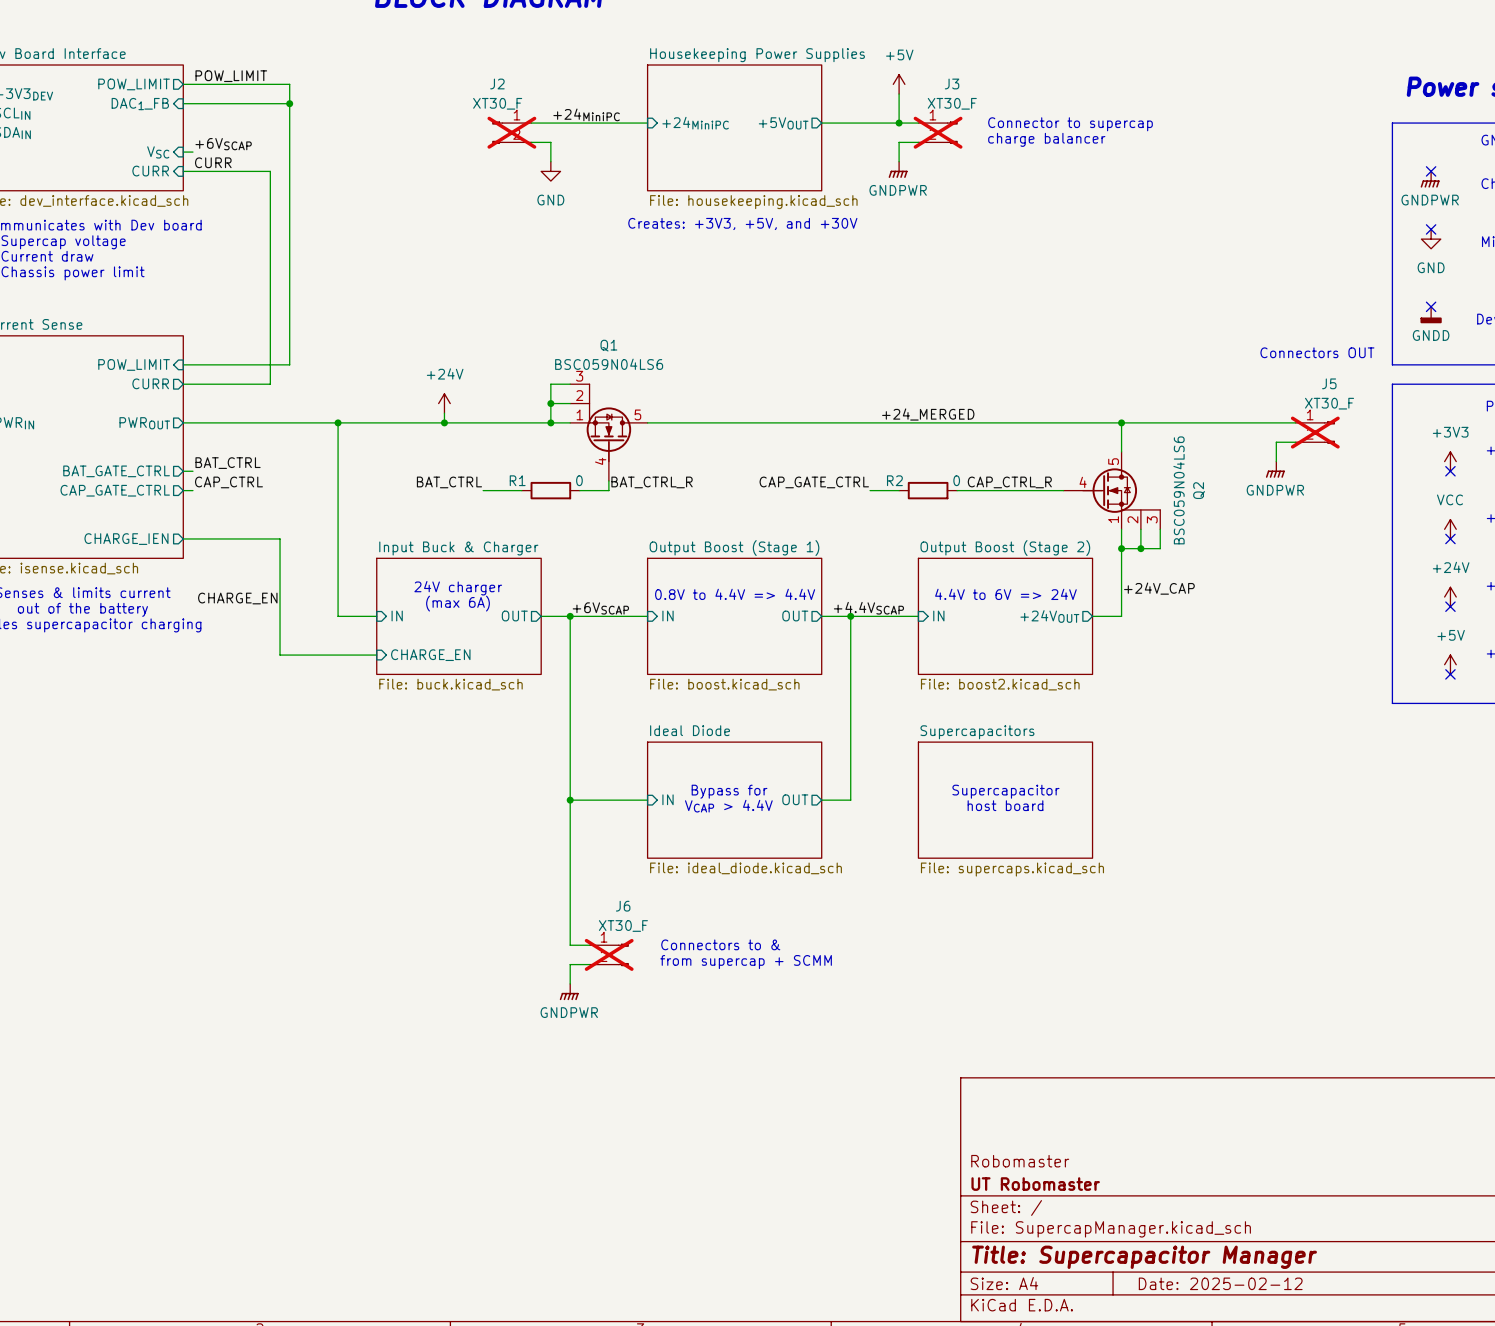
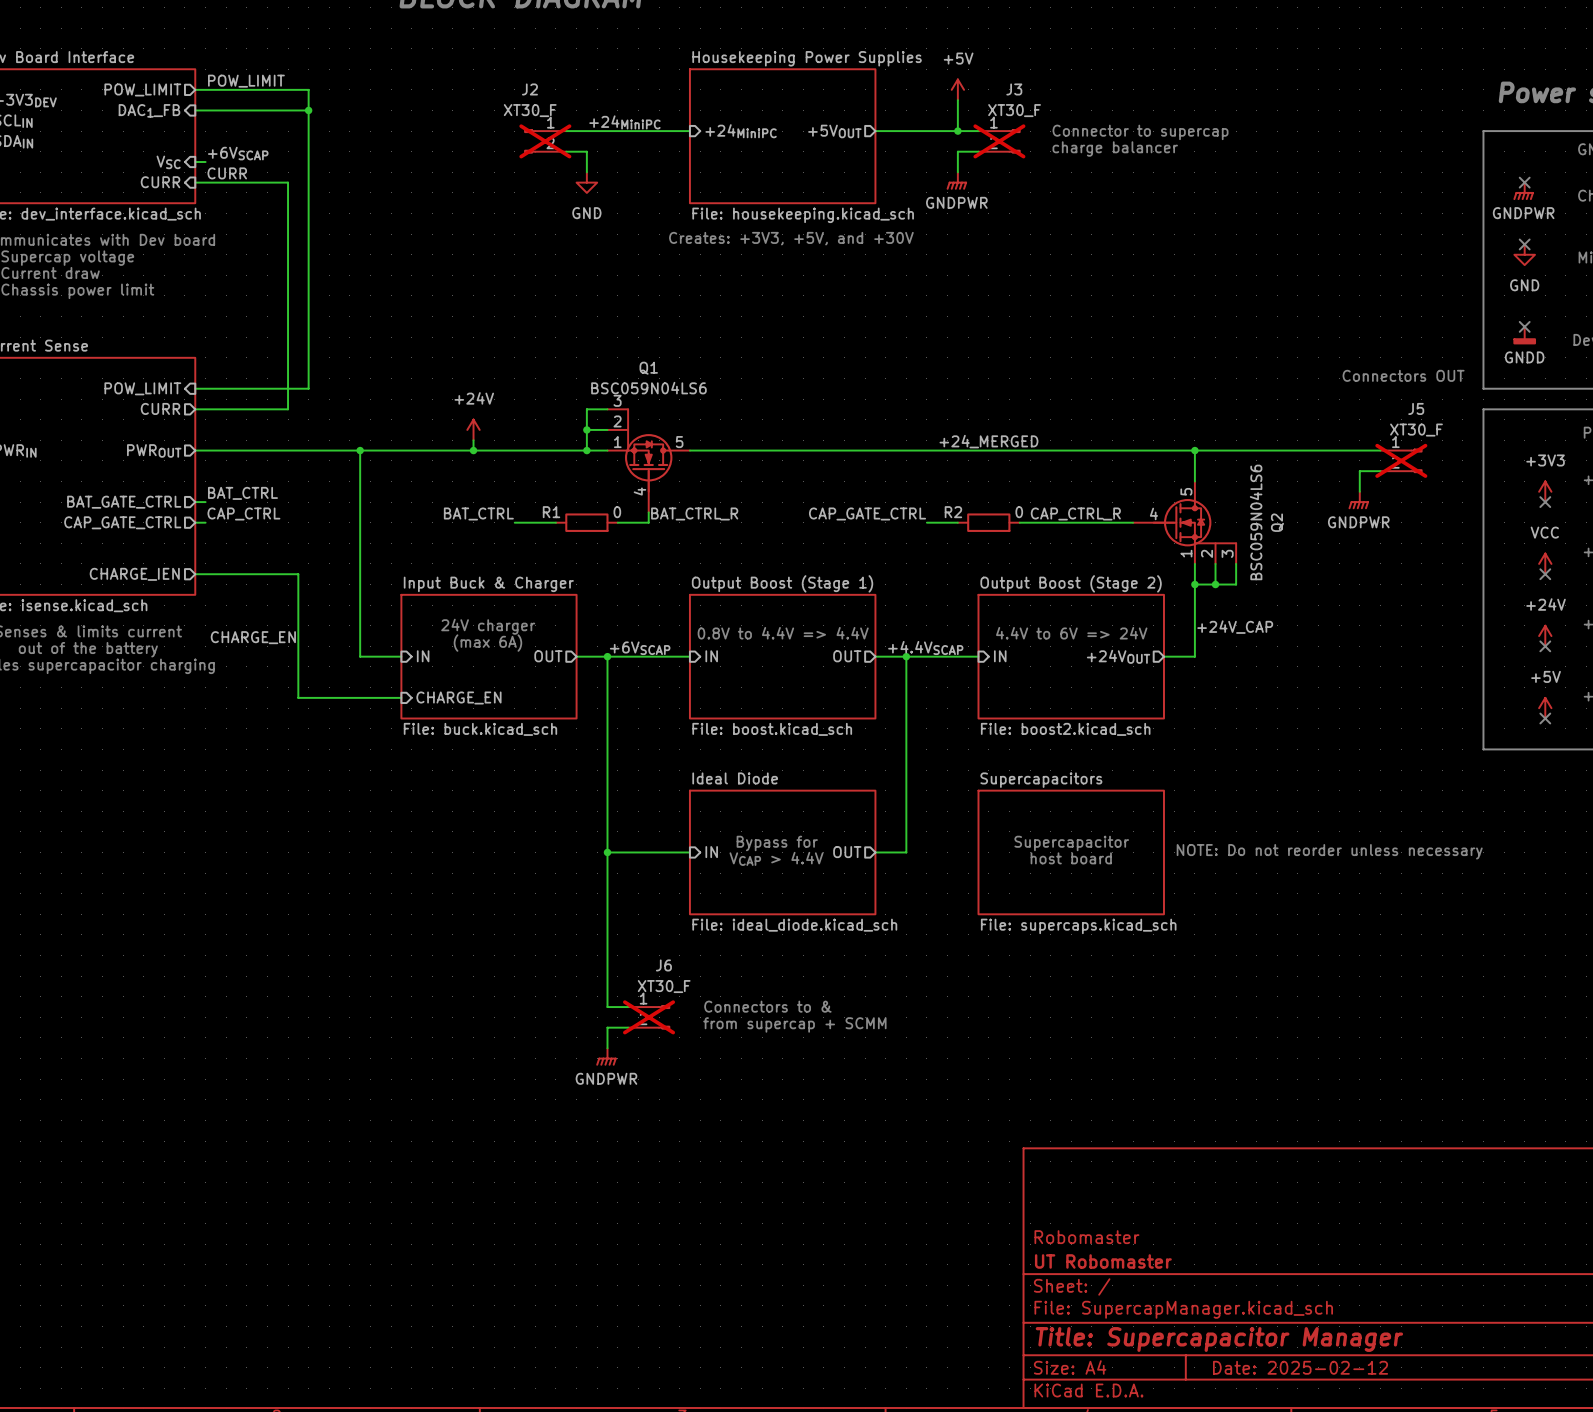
text: none -> NOTE: Do not reorder unless necessary (1329, 851)

